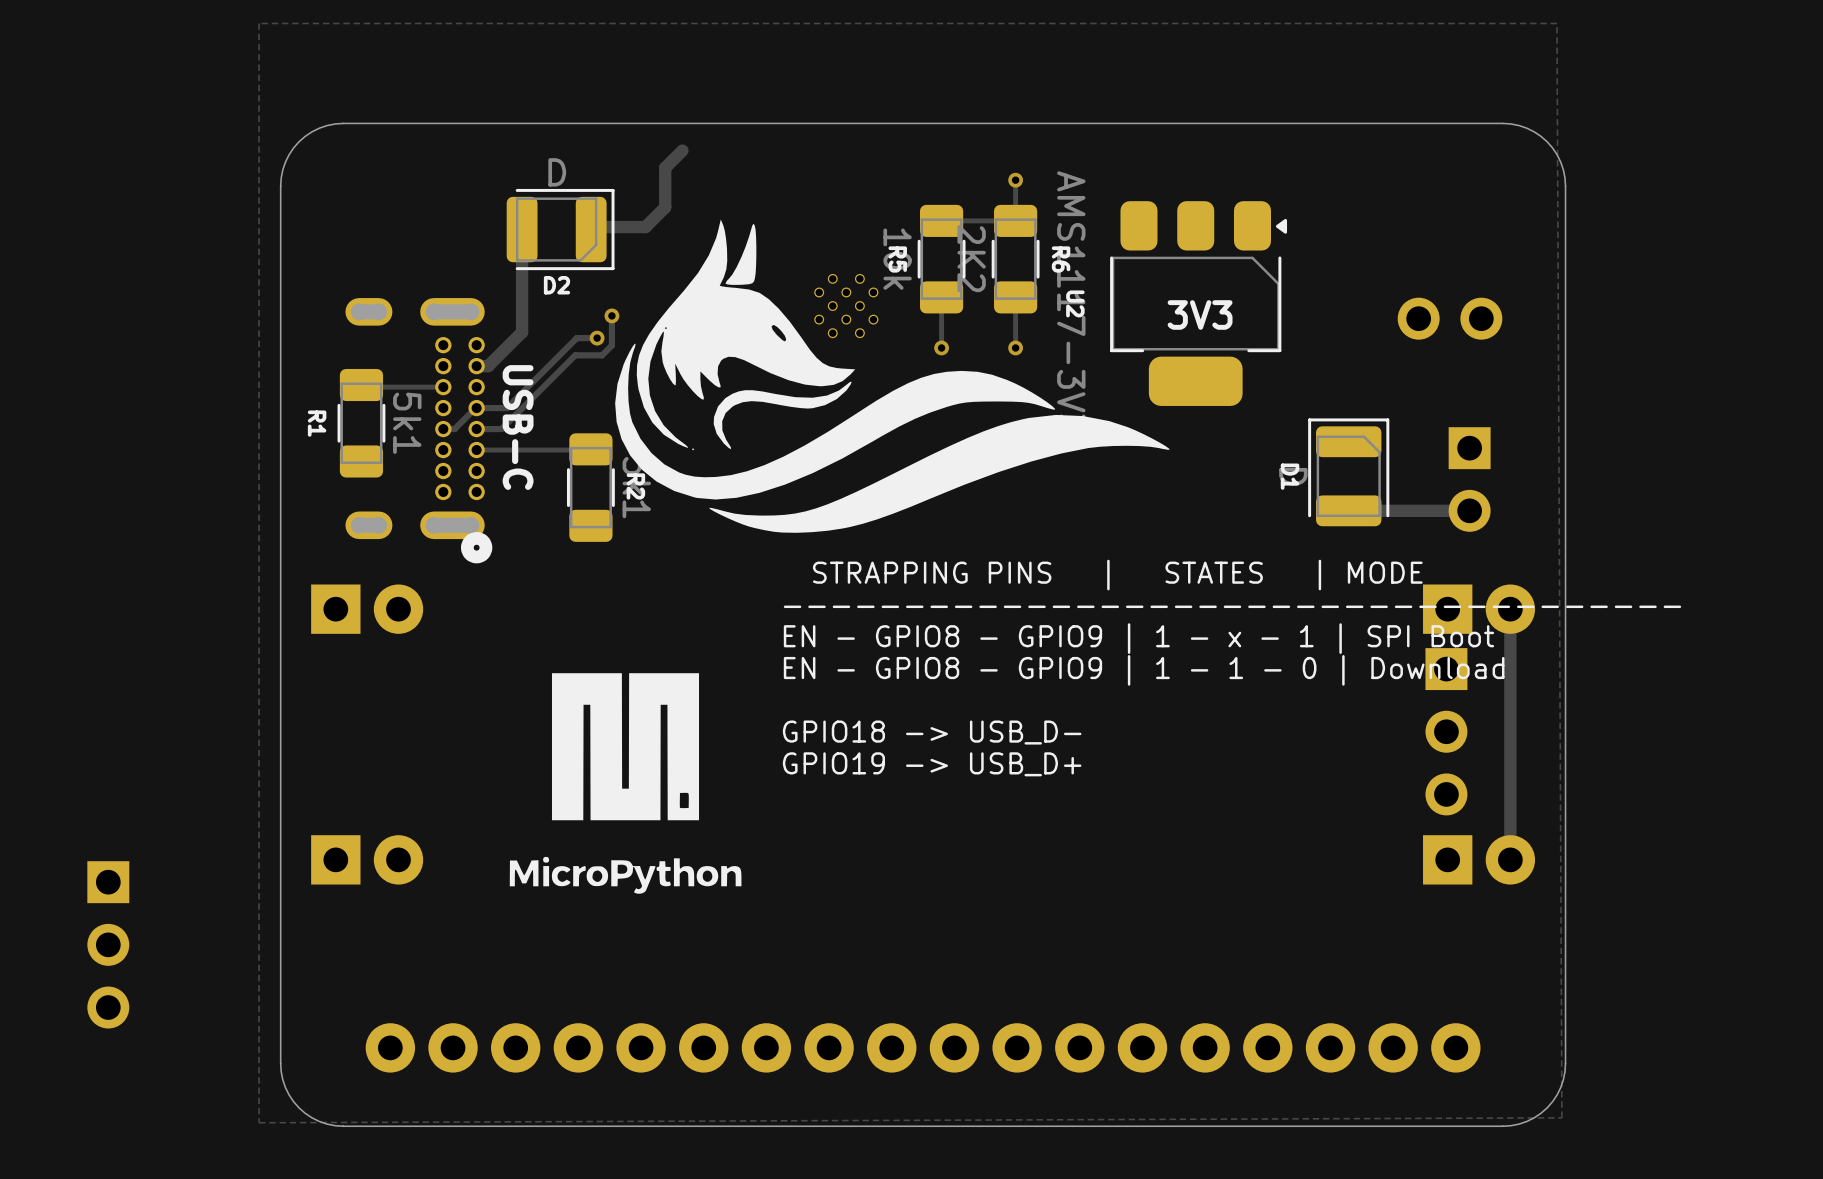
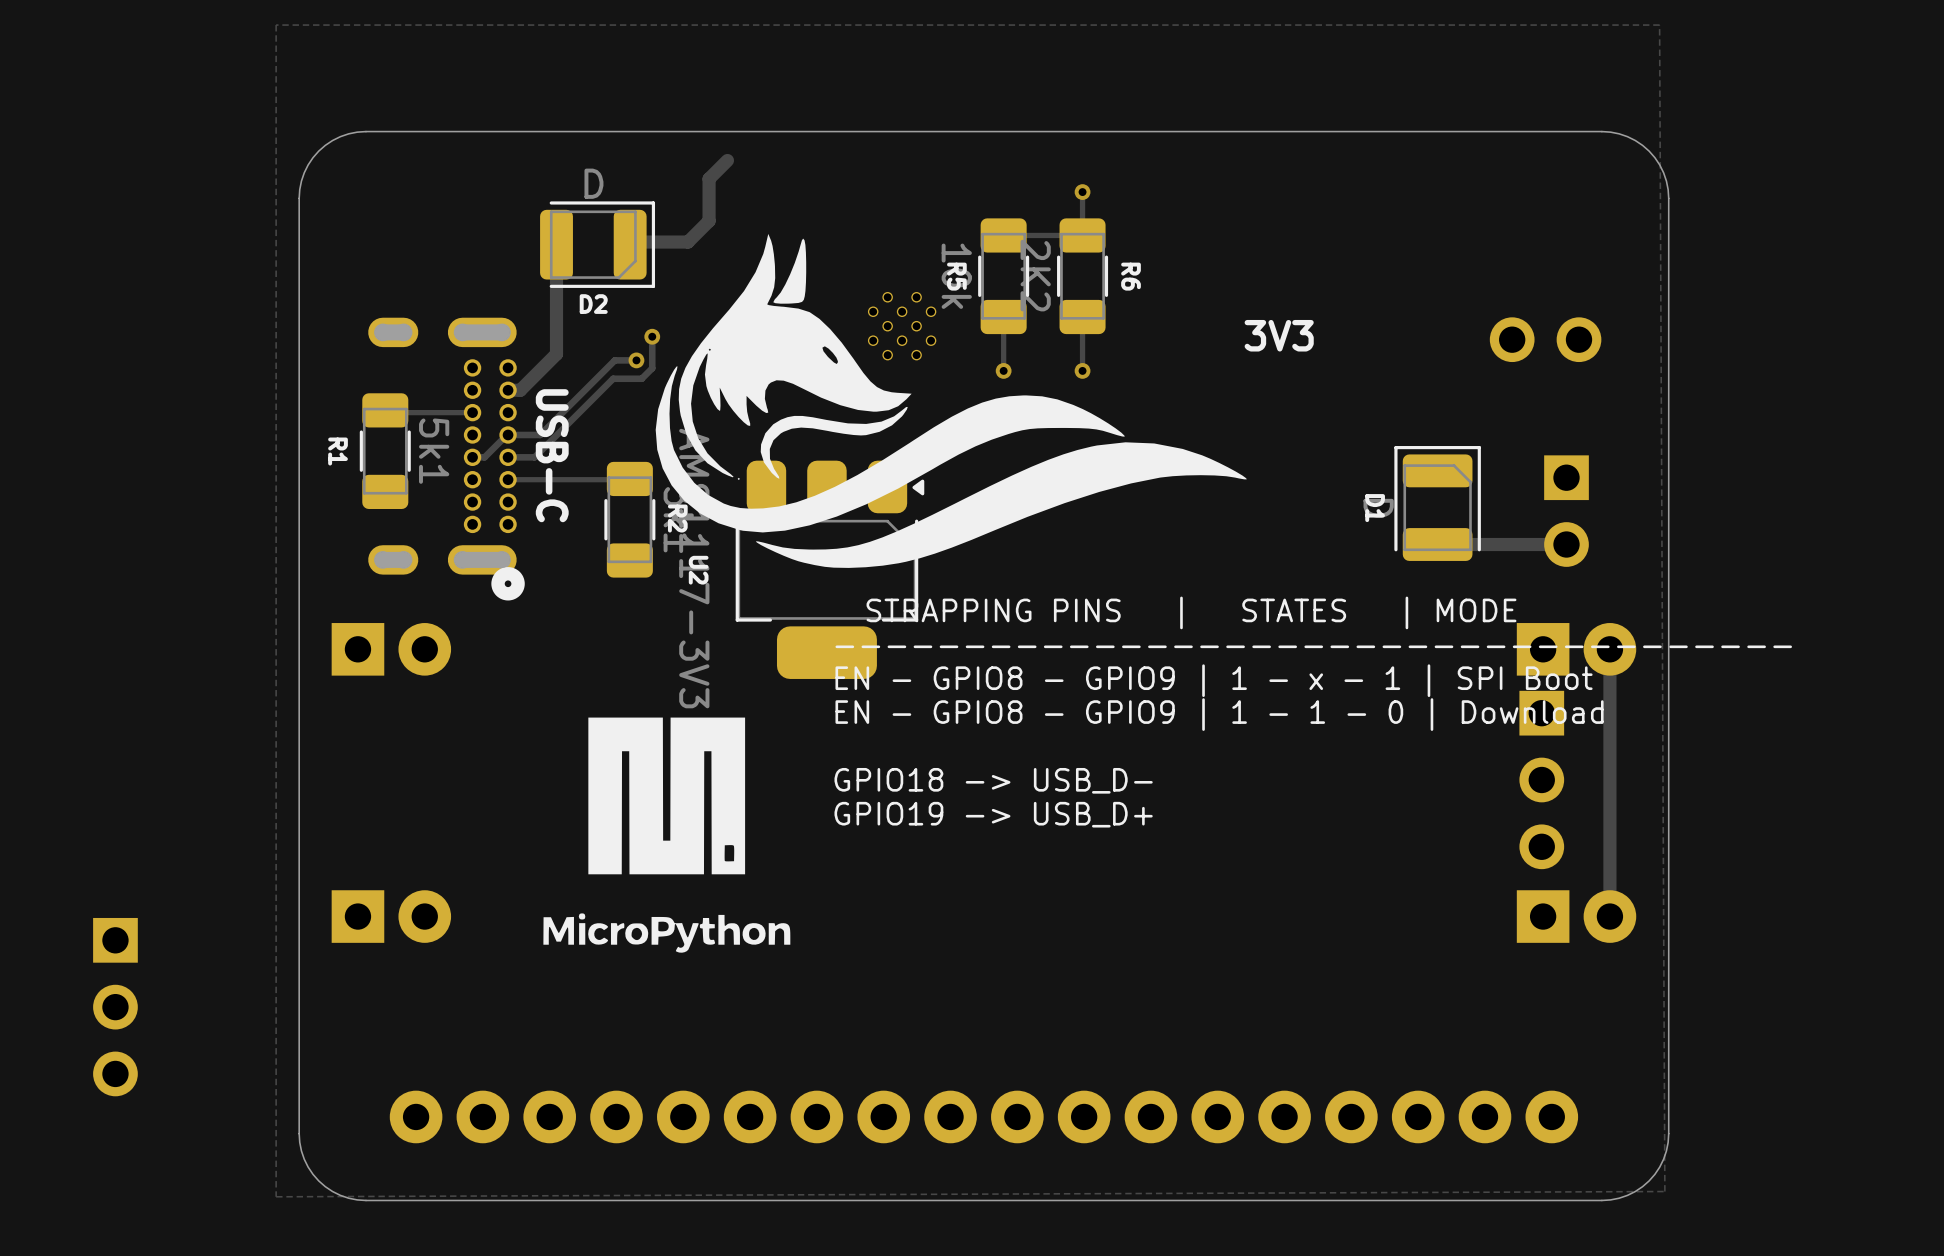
U2 position: (1198, 303) -> (829, 569)

